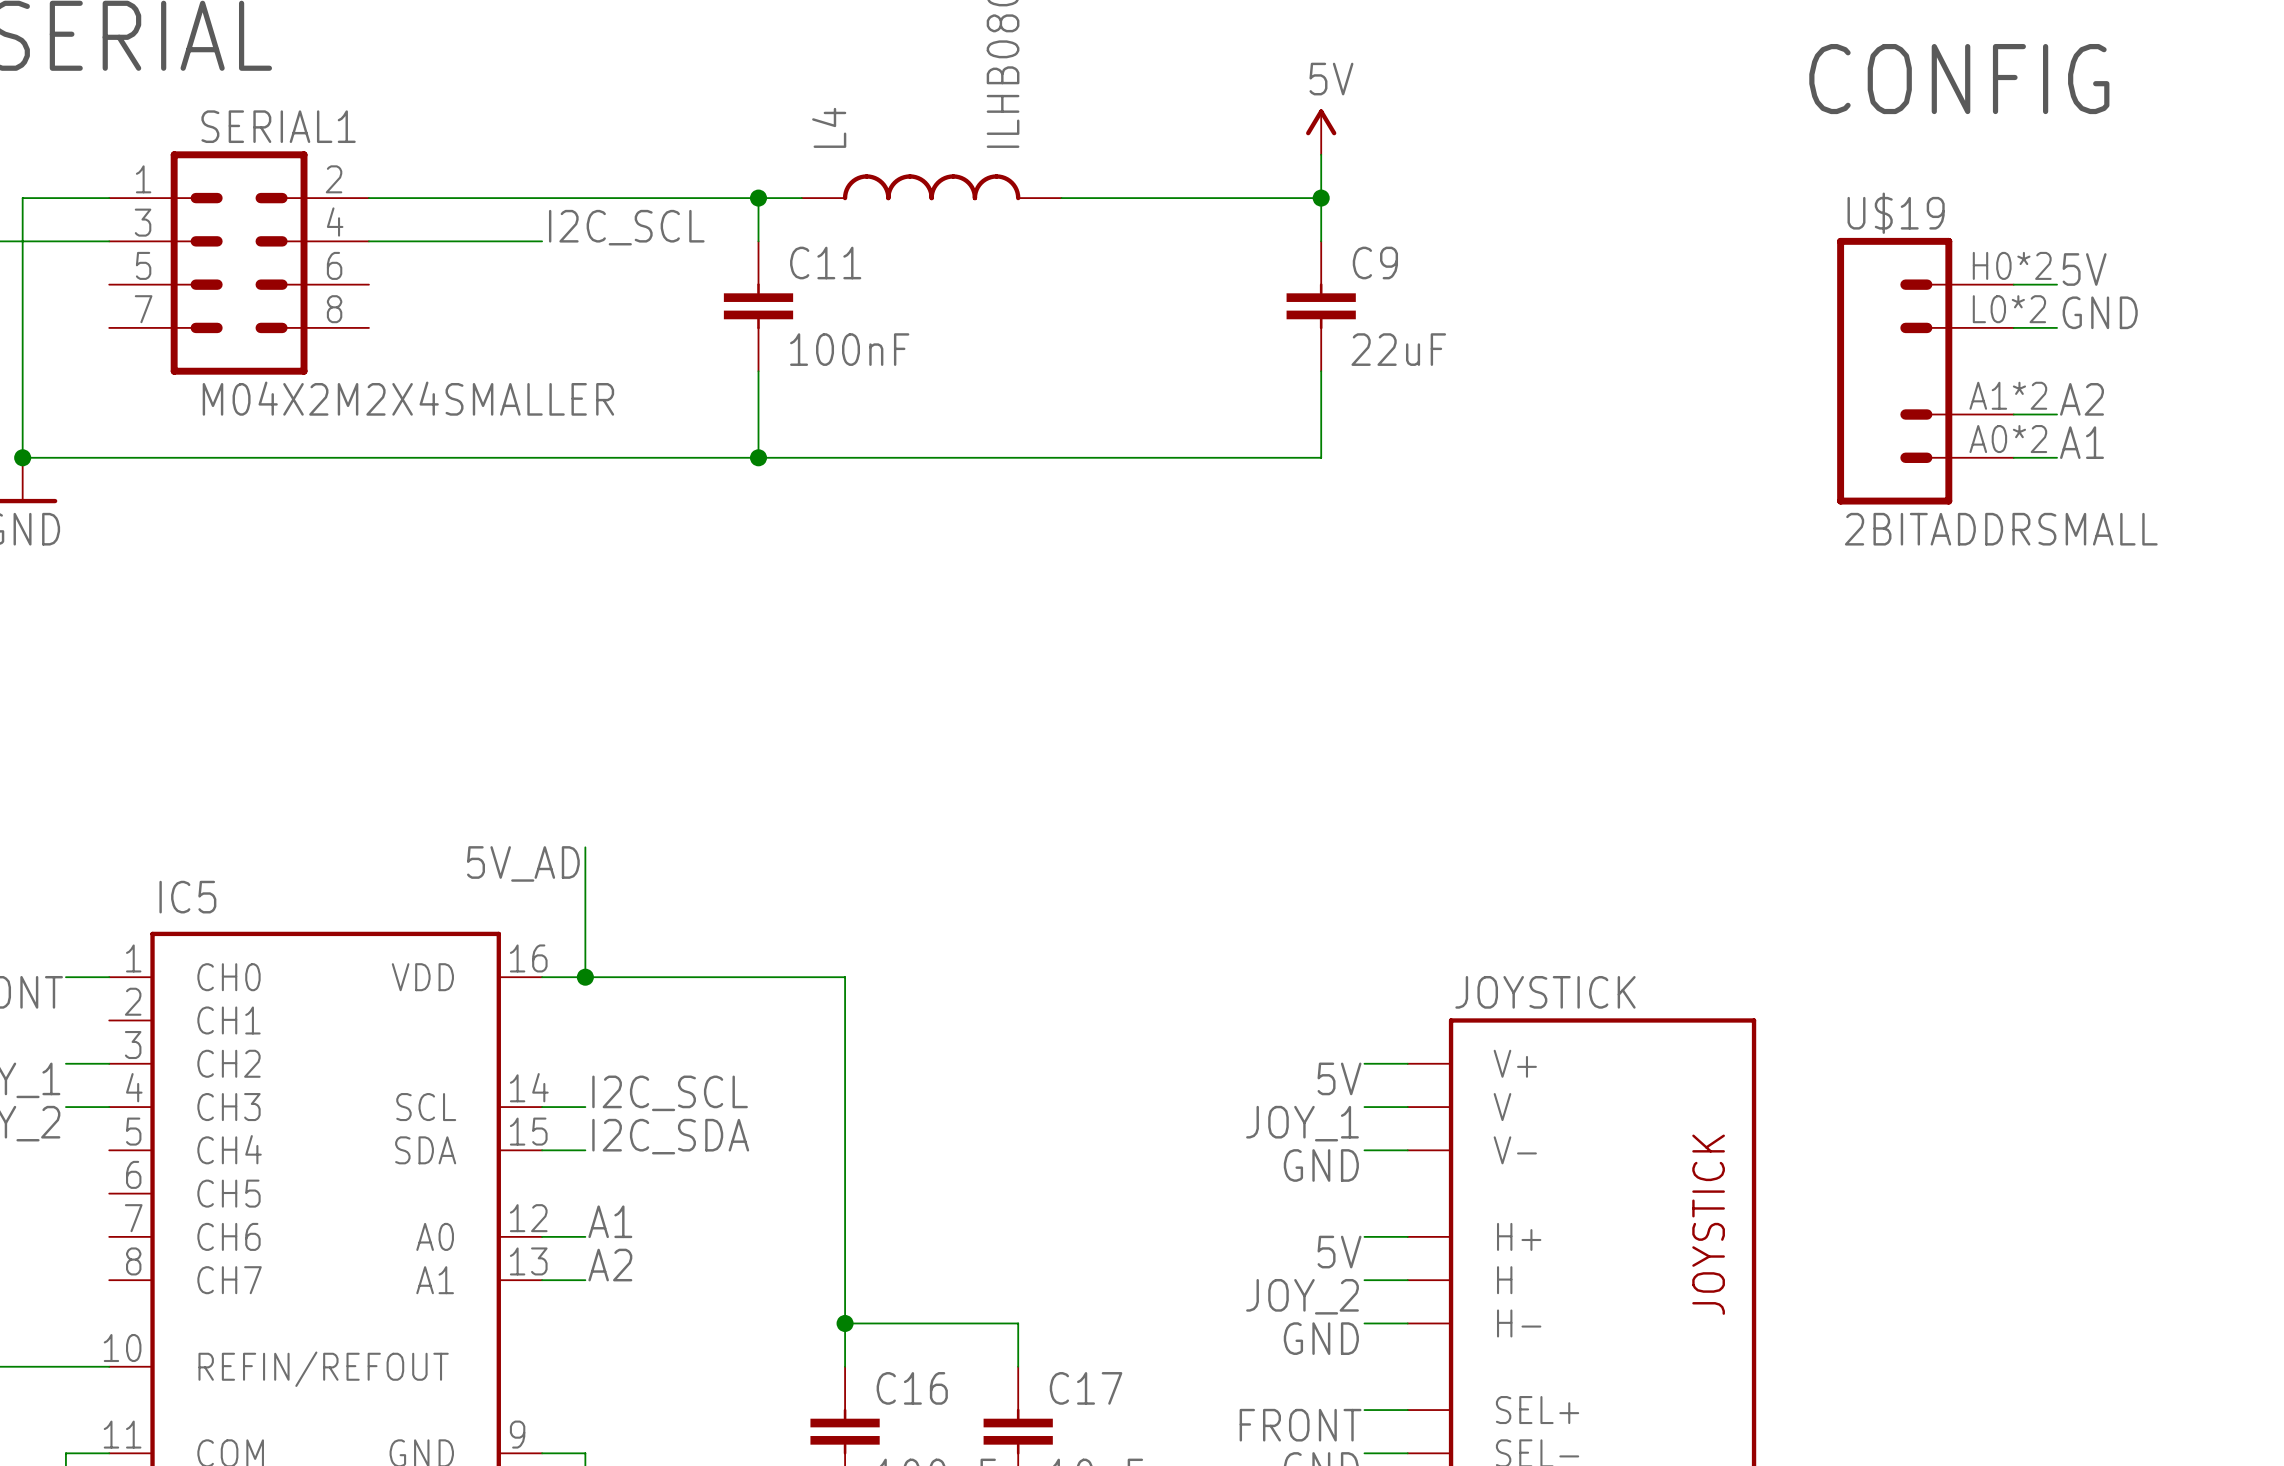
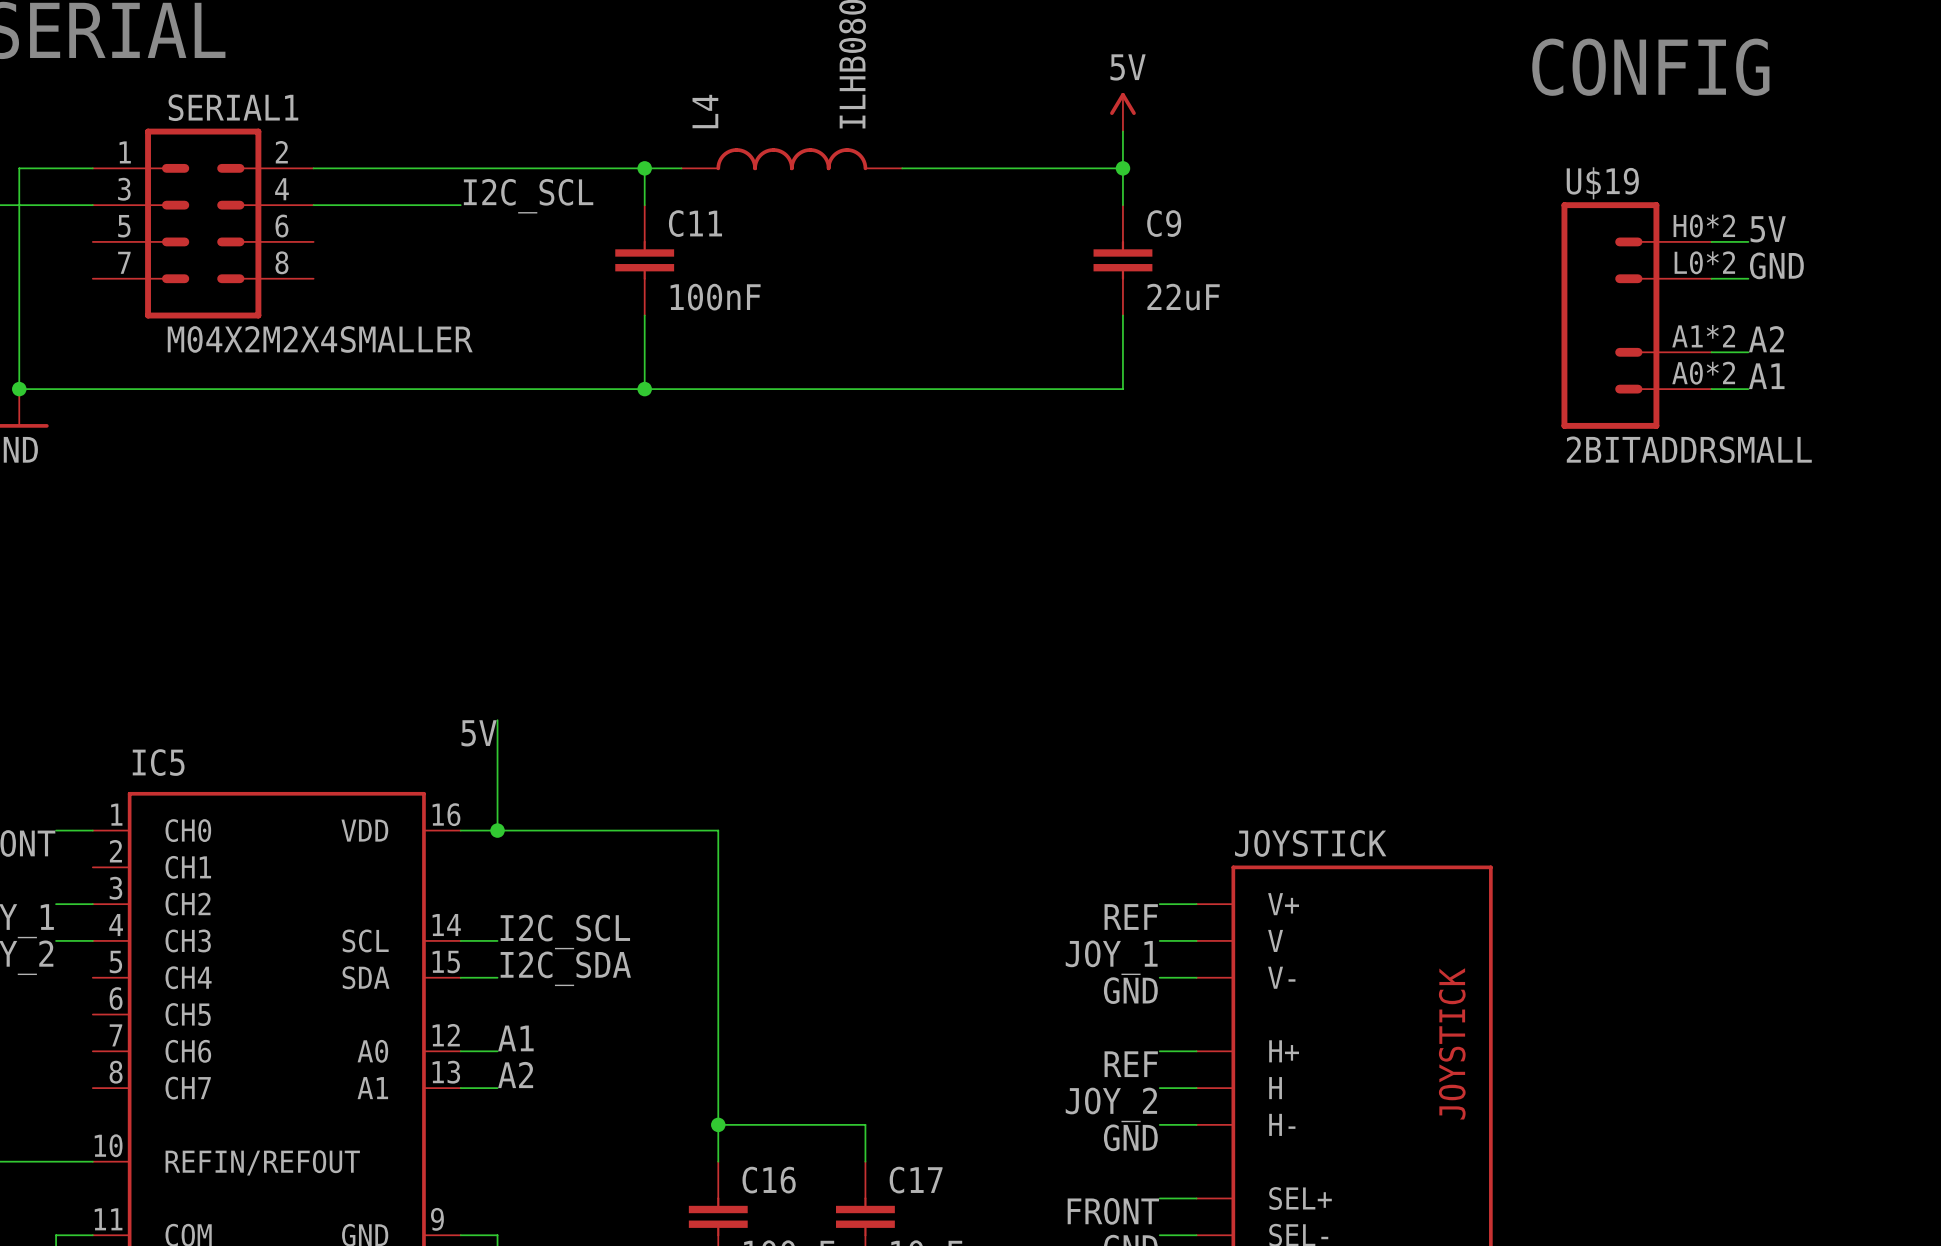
label: 5V_AD (523, 863) -> 5V (479, 733)
label: 5V (1339, 1078) -> REF (1131, 917)
label: 5V (1339, 1252) -> REF (1131, 1064)

